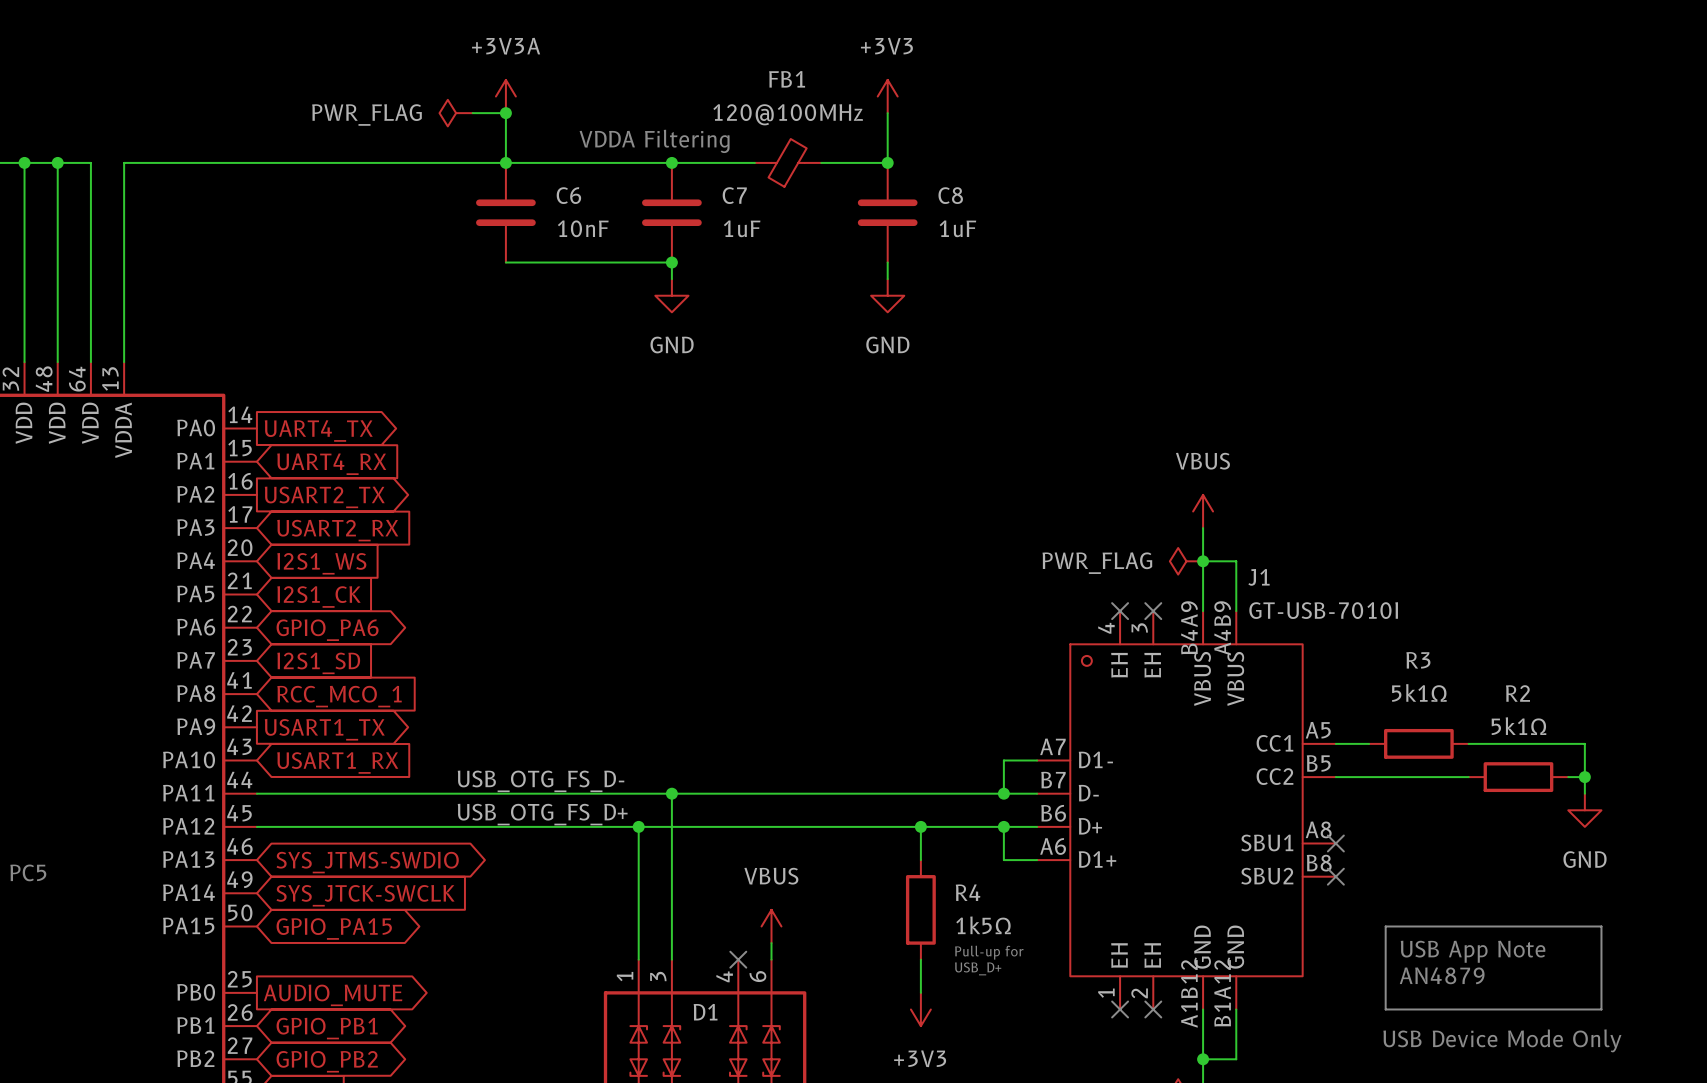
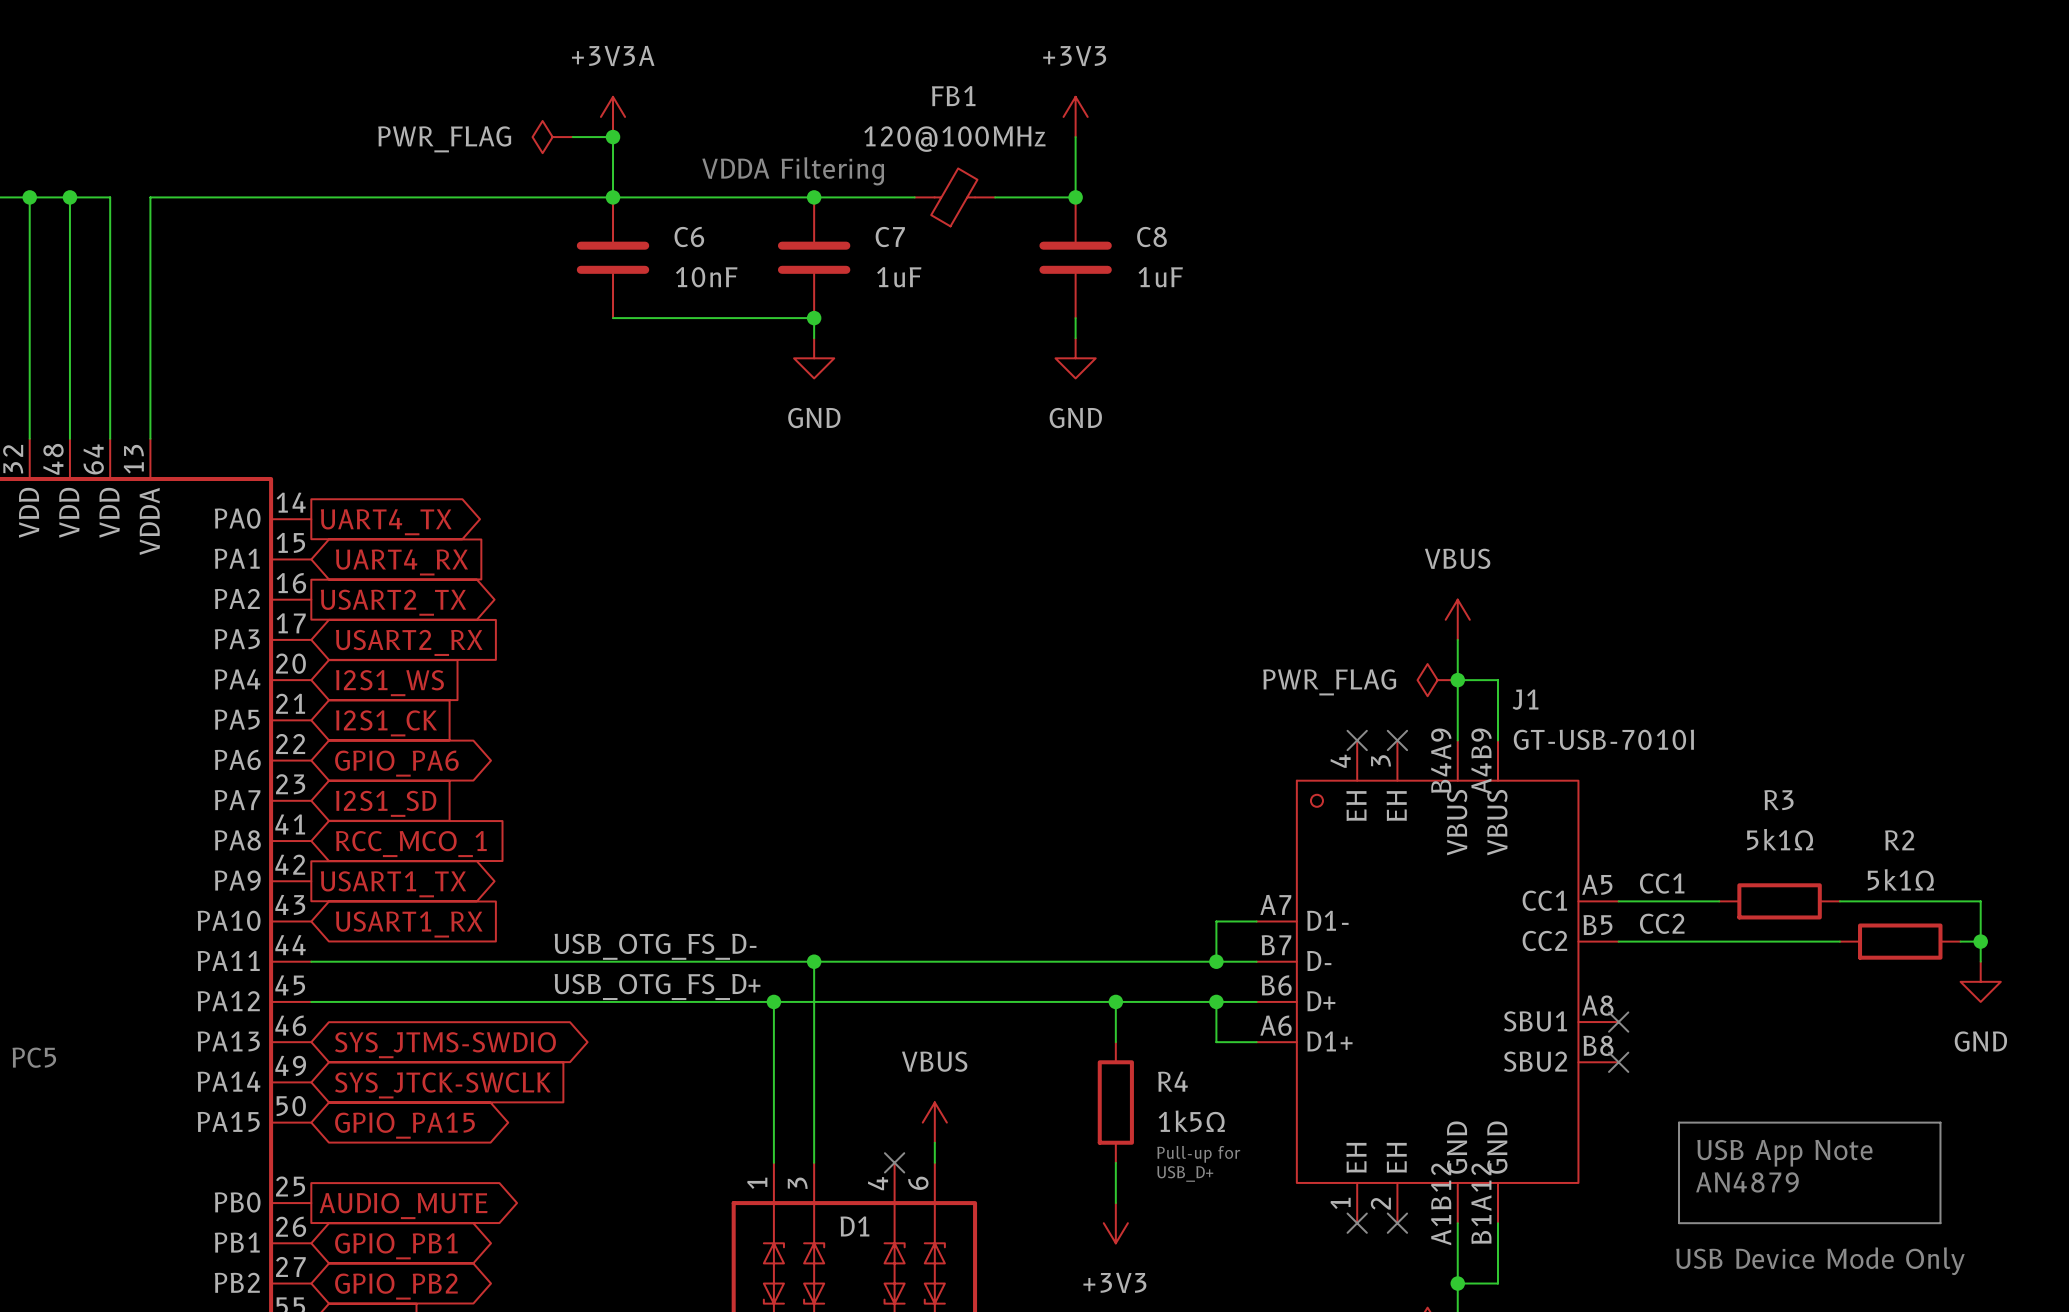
label: none -> CC1 (1662, 883)
wire: none -> (1658, 901) (1719, 901)
R3 position: (1418, 743) -> (1779, 901)
wire: (1468, 743) (1518, 743) -> (1779, 941) (1839, 941)
wire: (1584, 743) (1584, 793) -> (1920, 901) (1980, 901) (1980, 961)
label: none -> CC2 (1662, 923)
R2 position: (1518, 777) -> (1900, 941)
wire: (1568, 777) (1584, 777) -> (1960, 941) (1980, 941)
junction position: (1584, 777) -> (1980, 941)
power symbol position: GND (1584, 810) -> GND (1980, 981)

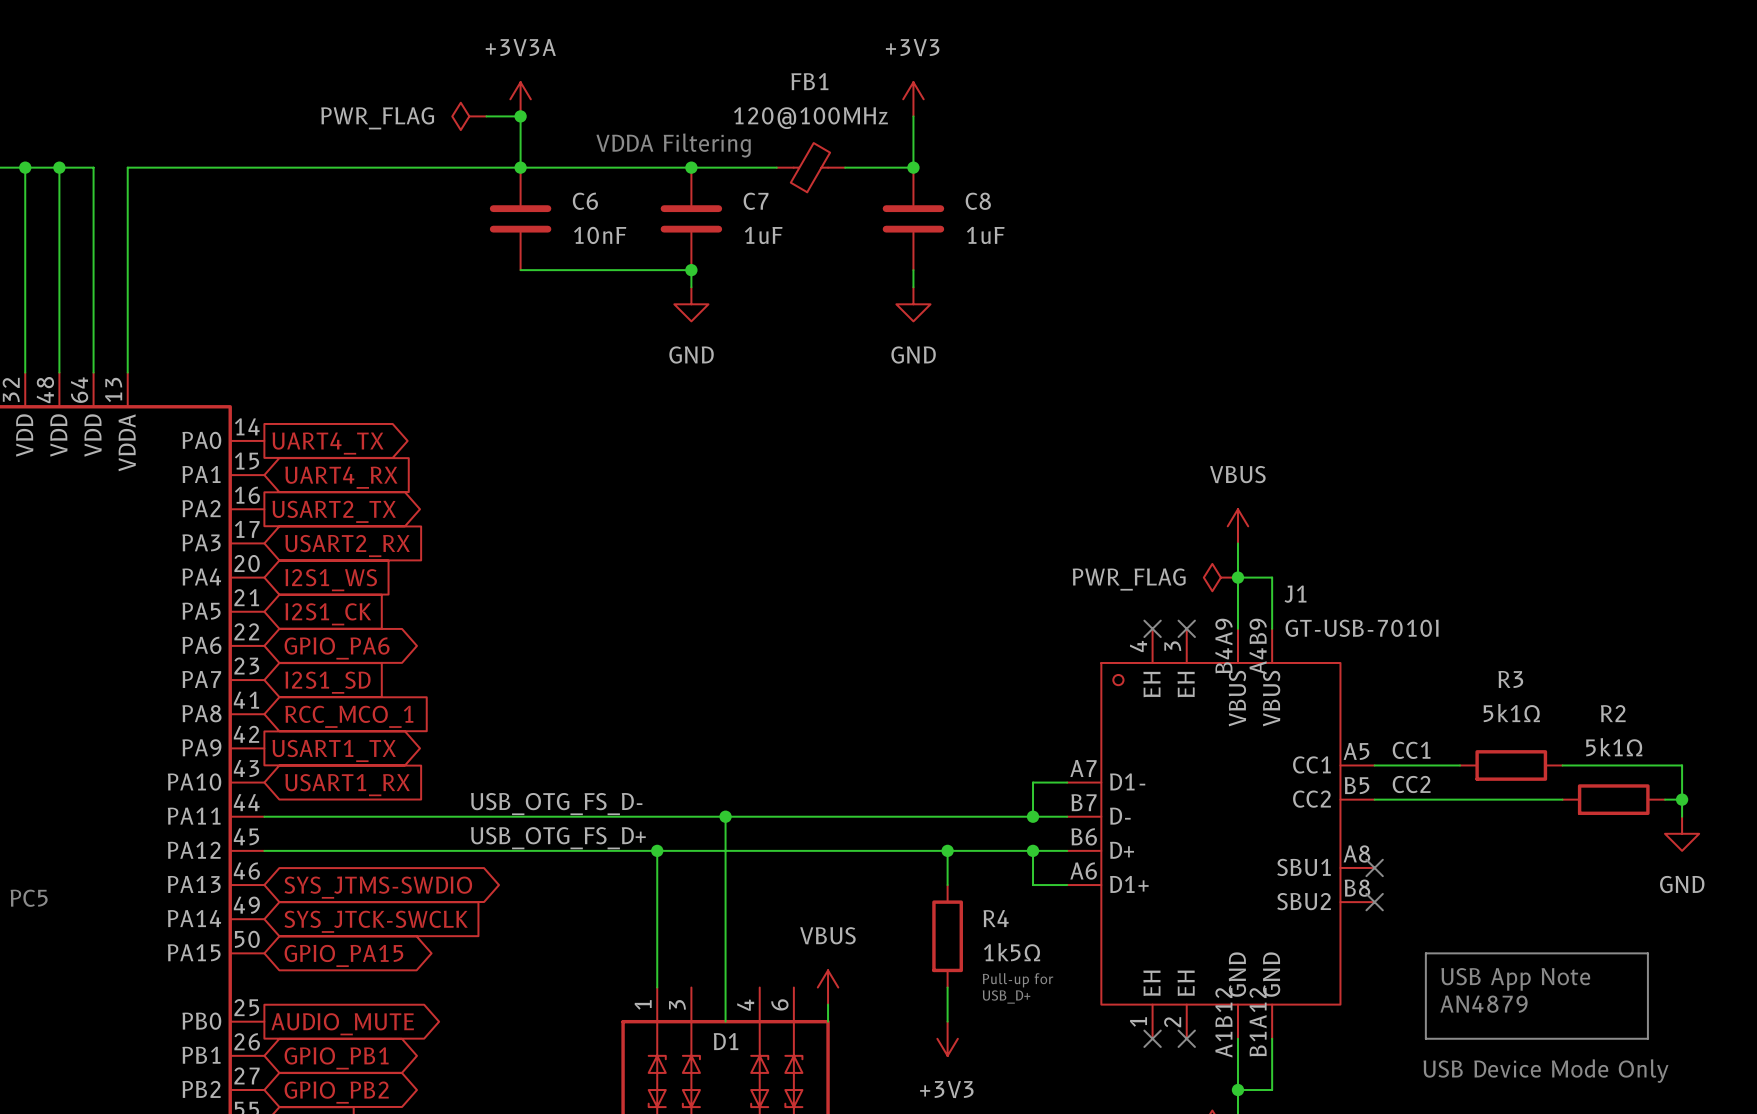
wire: (814, 961) (814, 1162) -> none
junction position: (814, 961) -> (725, 816)
wire: none -> (725, 816) (725, 1021)
power symbol position: VBUS (934, 1122) -> VBUS (828, 987)
wire: (934, 1142) (934, 1162) -> (828, 1004) (828, 1021)
no-connect mark: (894, 1162) -> none

